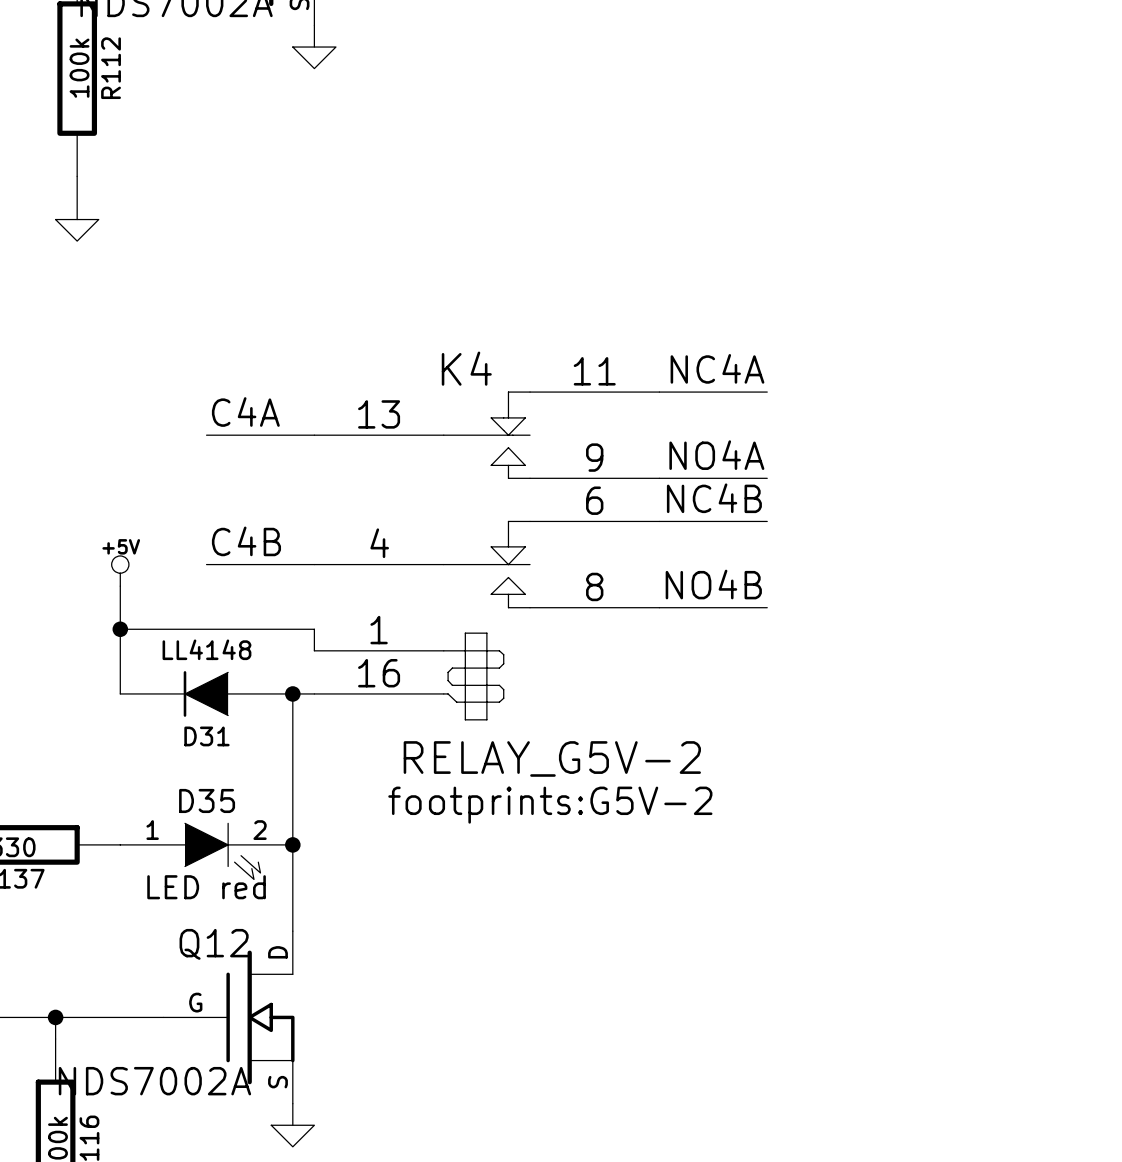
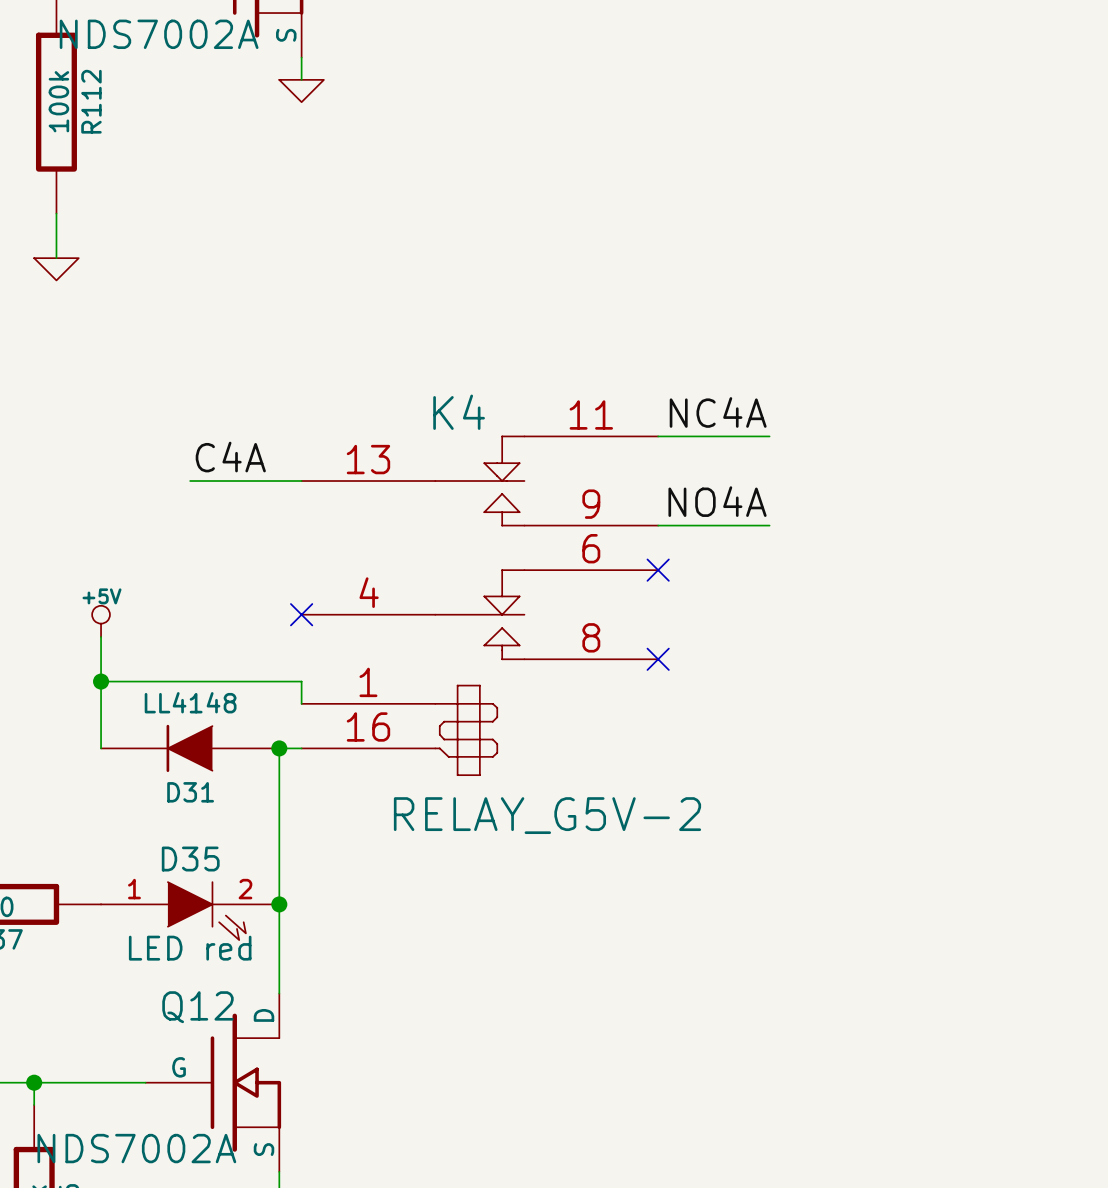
label: NC4B (714, 498) -> none
wire: (659, 521) (767, 521) -> none
no-connect mark: none -> (658, 570)
label: C4B (246, 541) -> none
wire: (206, 564) (314, 564) -> none
no-connect mark: none -> (301, 614)
label: NO4B (713, 584) -> none
wire: (659, 607) (767, 607) -> none
no-connect mark: none -> (658, 659)
K4 text: footprints:G5V-2 (550, 805) -> none

